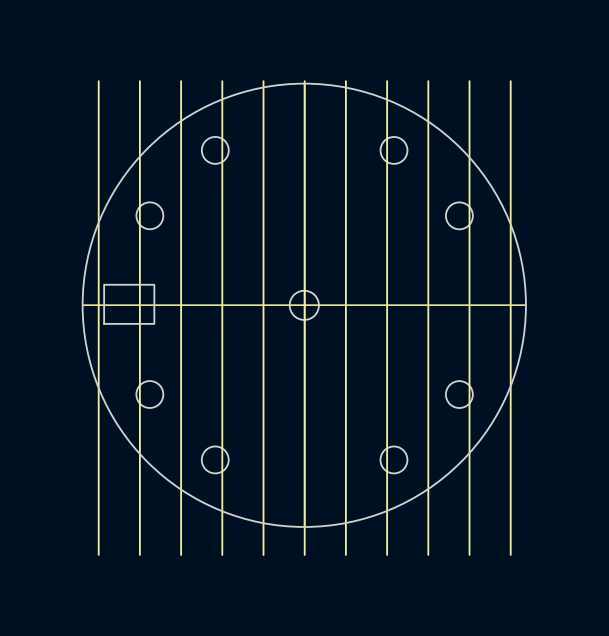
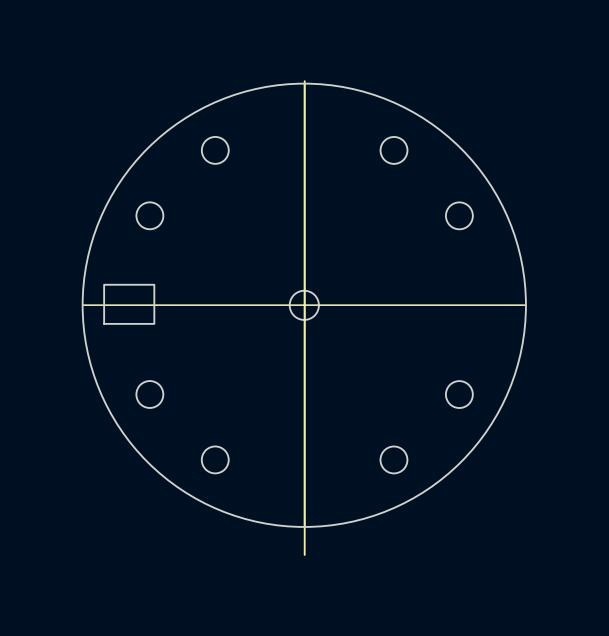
line: (98, 81) (98, 554) -> none
line: (139, 81) (139, 554) -> none
line: (181, 81) (181, 554) -> none
line: (222, 81) (222, 554) -> none
line: (263, 81) (263, 554) -> none
line: (345, 81) (345, 554) -> none
line: (387, 81) (387, 554) -> none
line: (428, 81) (428, 554) -> none
line: (469, 81) (469, 554) -> none
line: (510, 81) (510, 554) -> none

